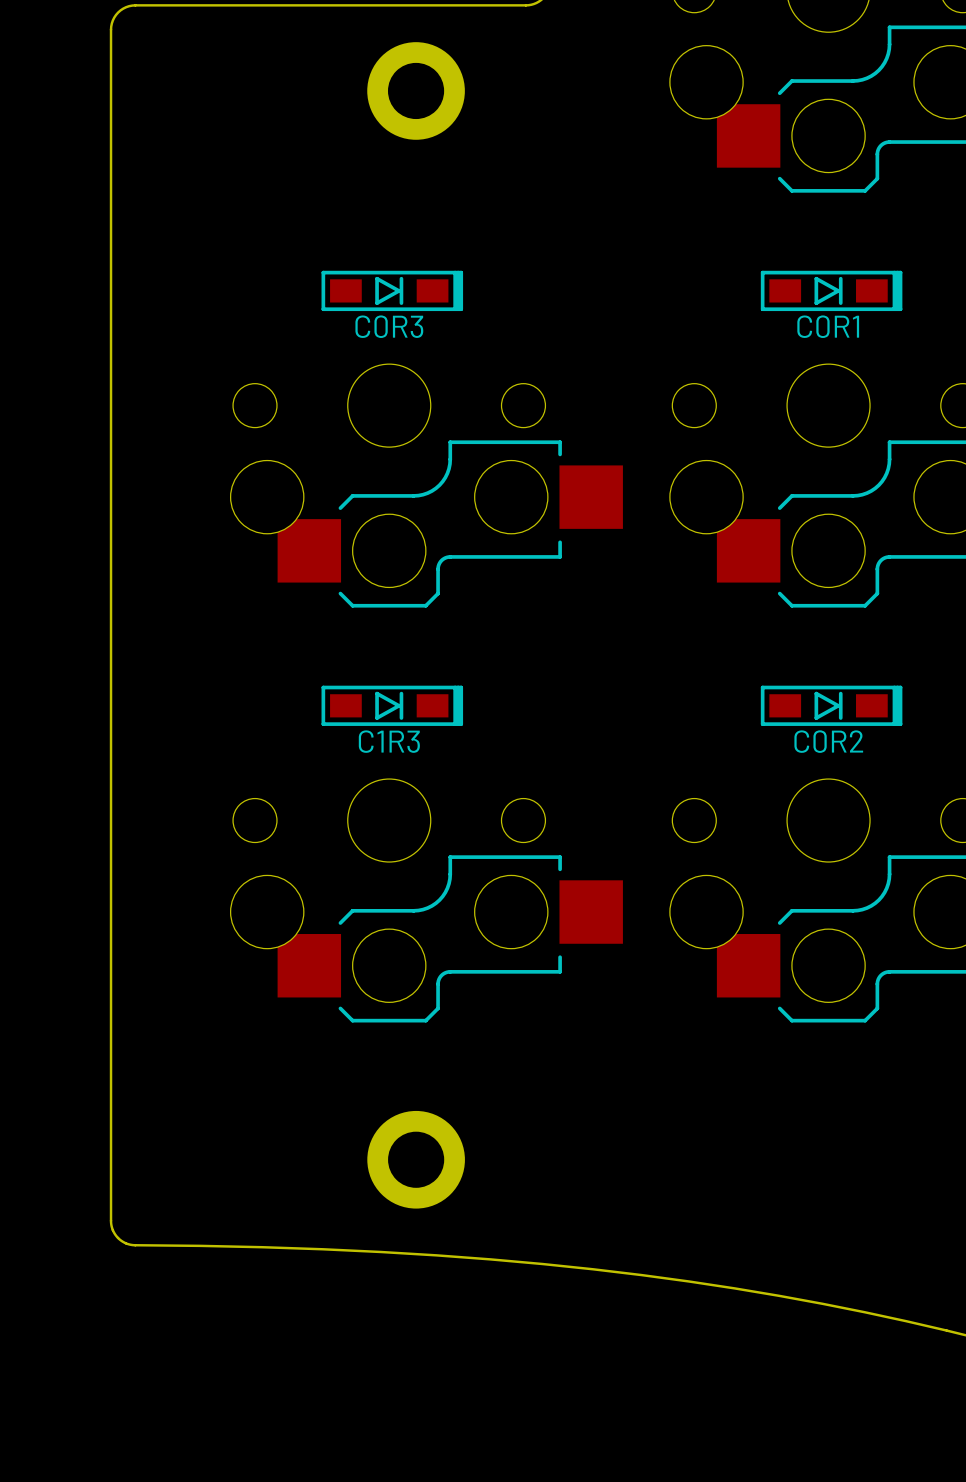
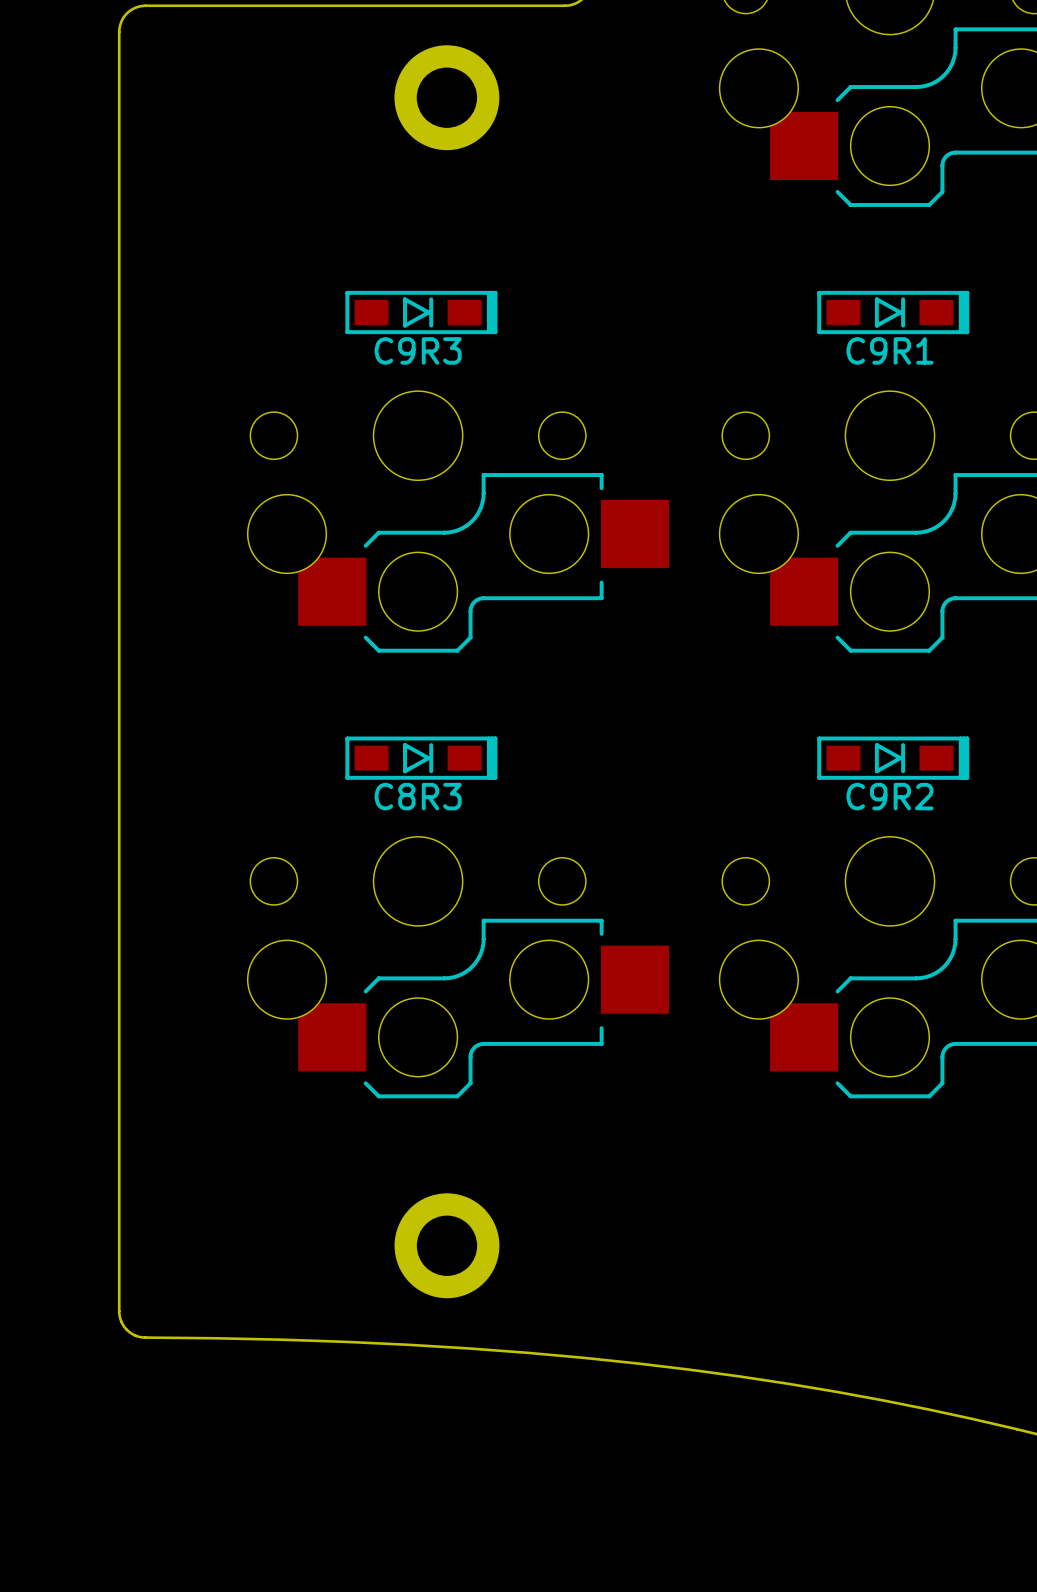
part text: C0R3 (389, 326) -> C9R3 (418, 350)
part text: C0R1 (828, 326) -> C9R1 (889, 350)
part text: C1R3 (389, 741) -> C8R3 (418, 796)
part text: C0R2 (828, 741) -> C9R2 (889, 796)

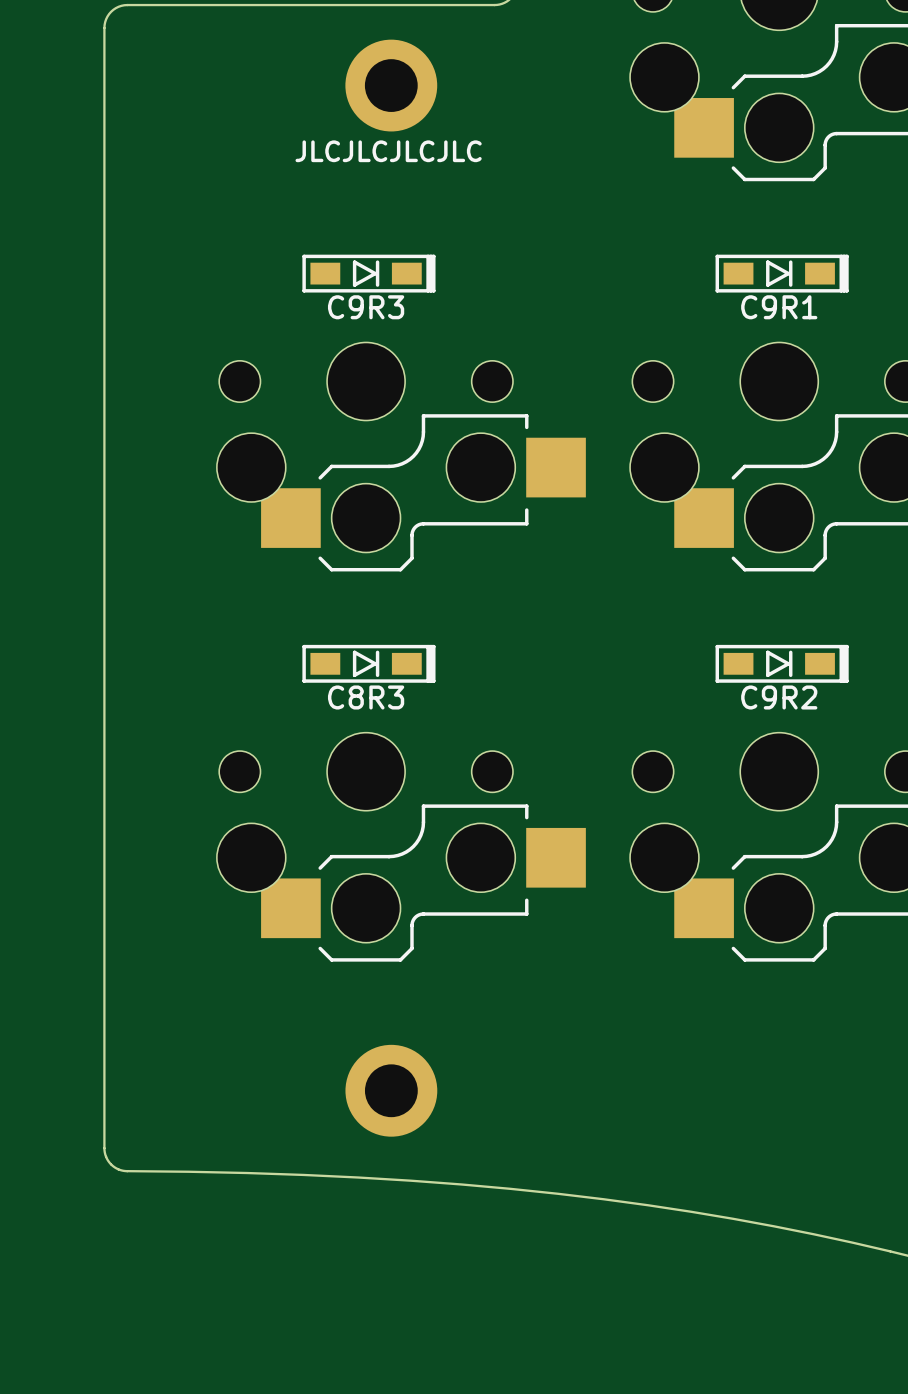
text: none -> JLCJLCJLCJLC (388, 151)

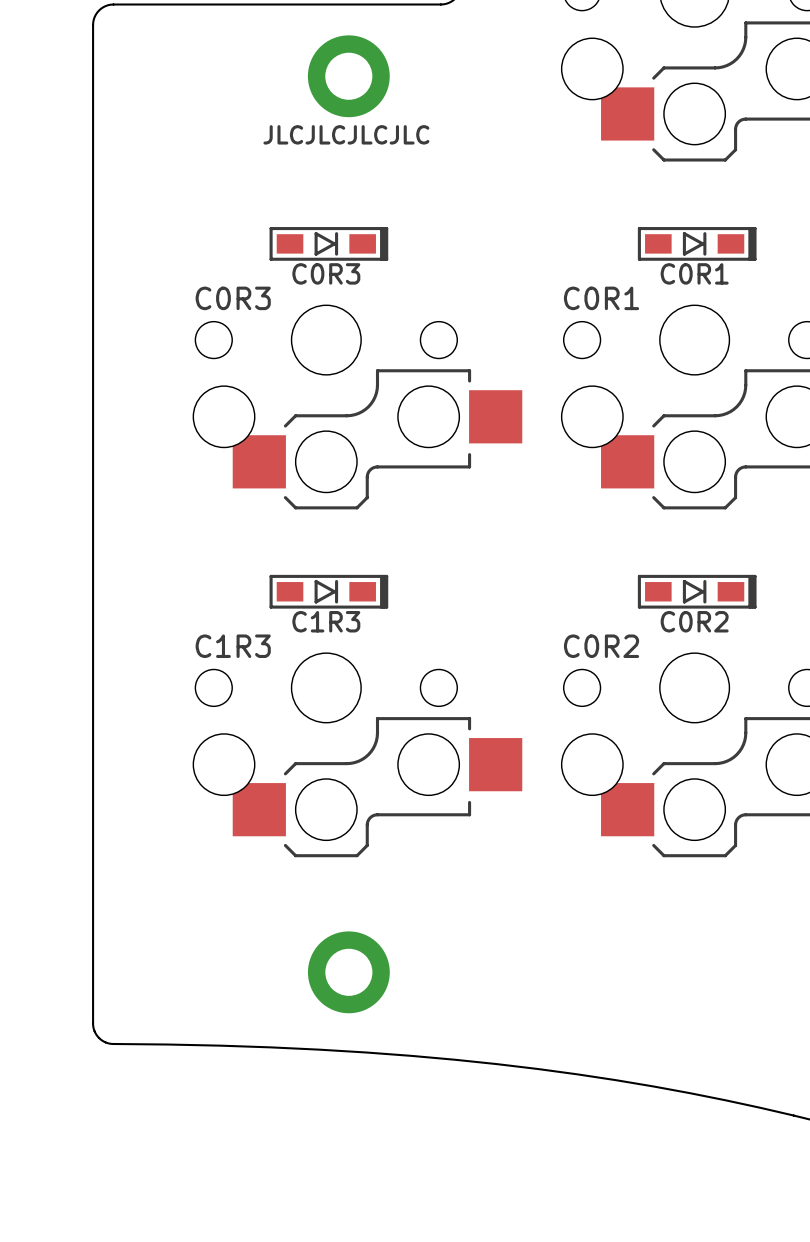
part text: C9R3 (366, 307) -> C0R3 (326, 273)
part text: C9R1 (779, 307) -> C0R1 (694, 273)
part text: none -> C0R3 (233, 298)
part text: none -> C0R1 (601, 298)
part text: C8R3 (366, 697) -> C1R3 (326, 621)
part text: C9R2 (779, 697) -> C0R2 (694, 621)
part text: none -> C1R3 (233, 646)
part text: none -> C0R2 (601, 646)

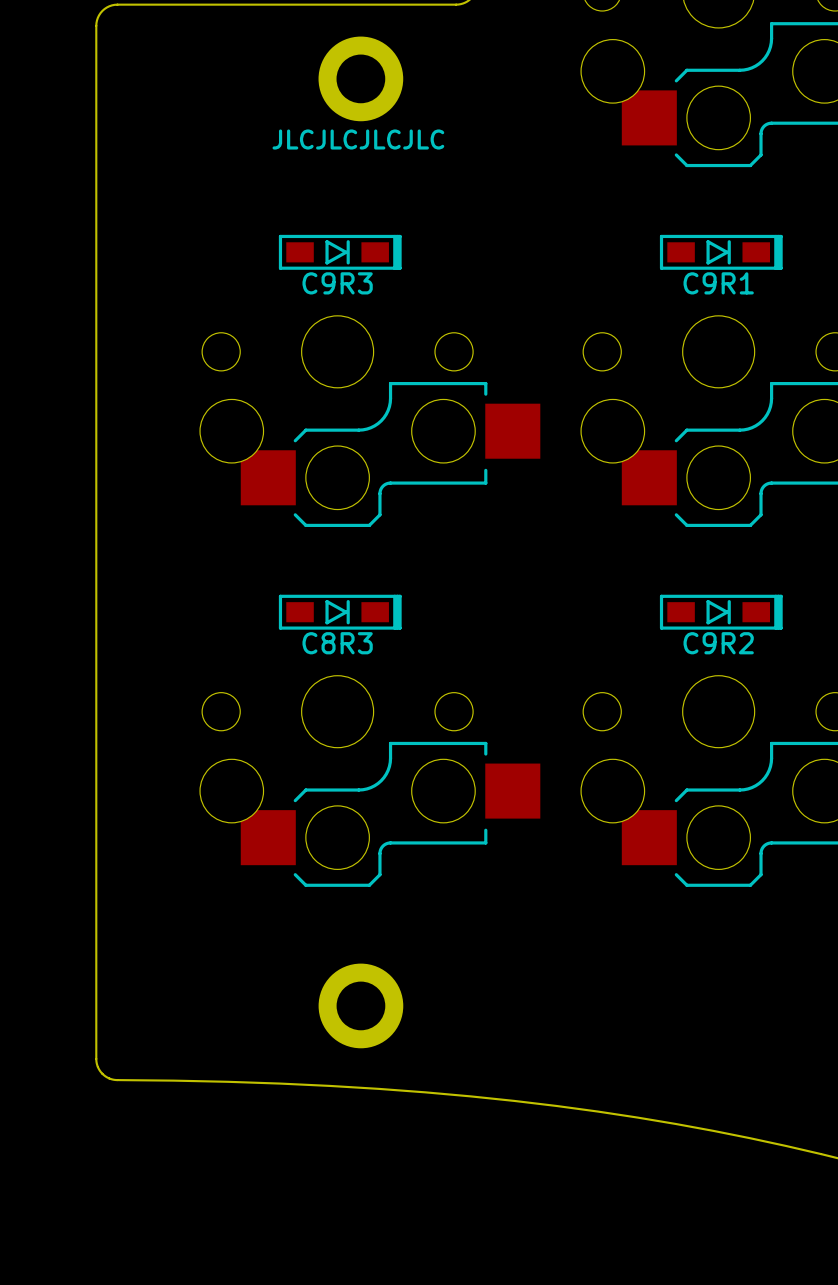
part text: C0R3 (326, 273) -> C9R3 (337, 283)
part text: C0R1 (694, 273) -> C9R1 (718, 283)
part text: C0R3 (233, 298) -> none
part text: C0R1 (601, 298) -> none
part text: C1R3 (326, 621) -> C8R3 (337, 643)
part text: C0R2 (694, 621) -> C9R2 (718, 643)
part text: C1R3 (233, 646) -> none
part text: C0R2 (601, 646) -> none

